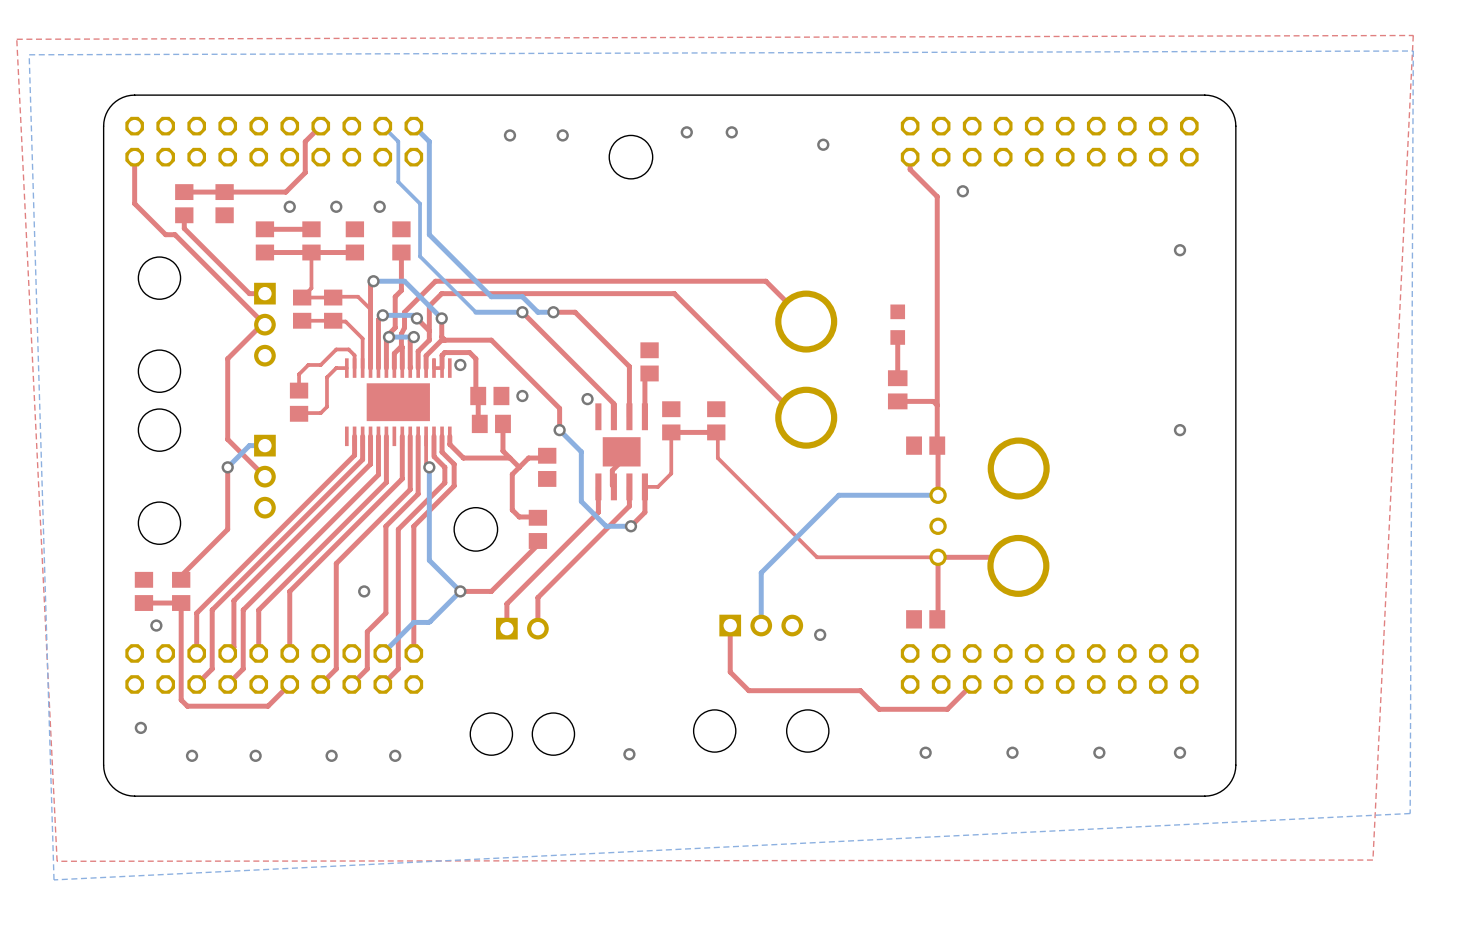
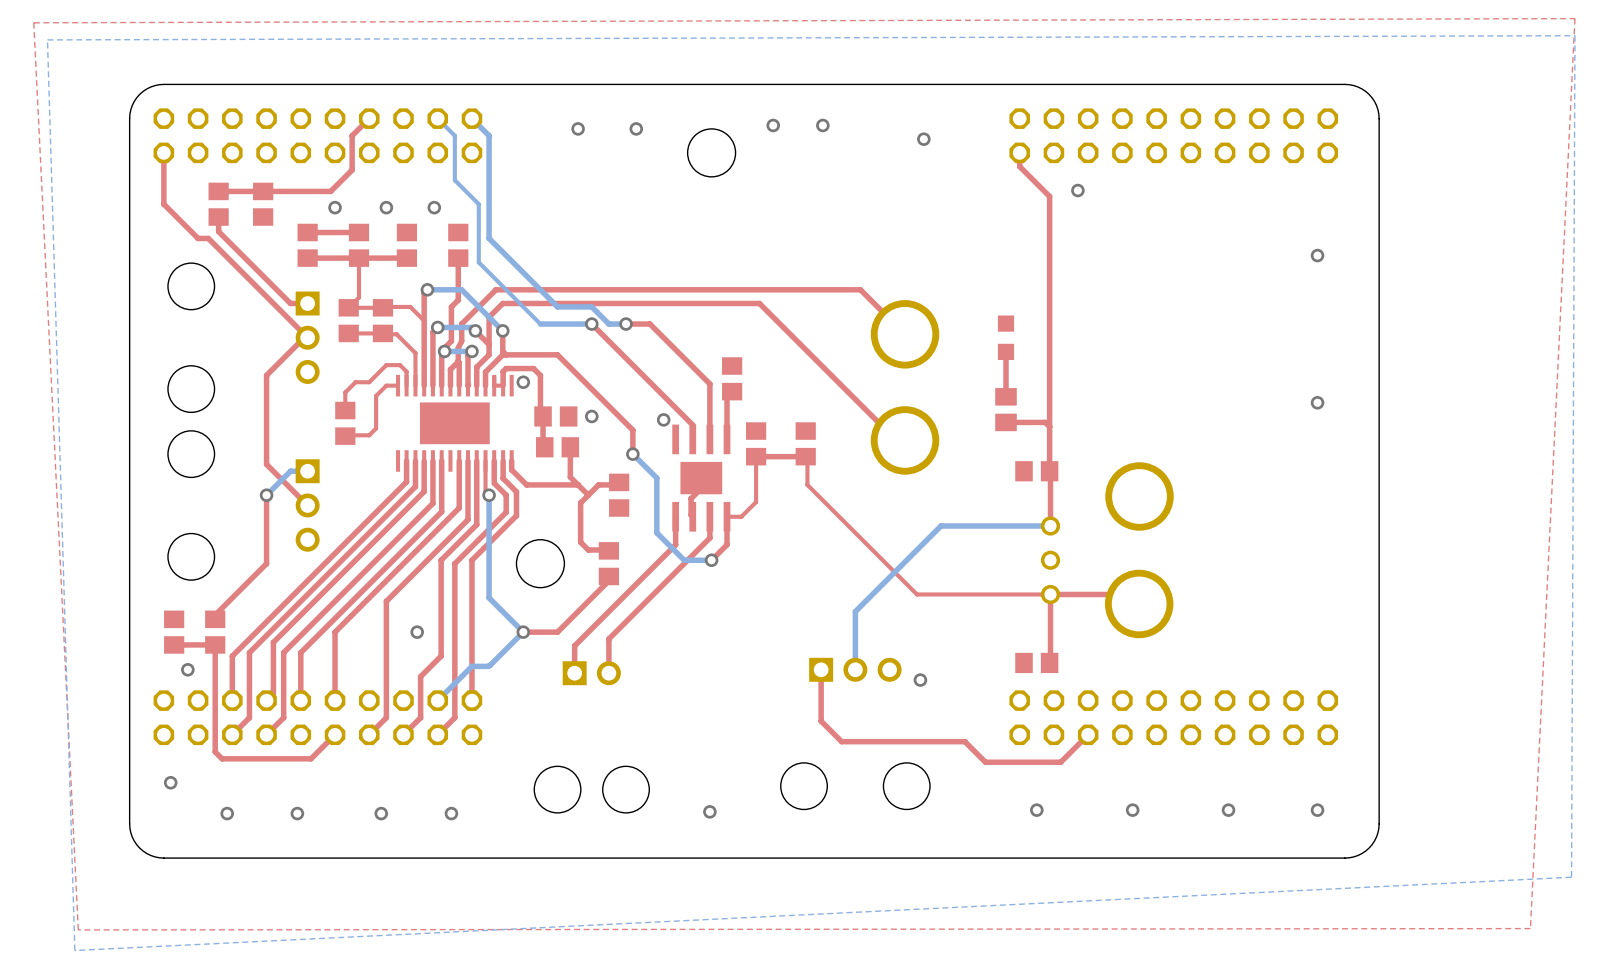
via position: (1180, 430) -> (1317, 402)

